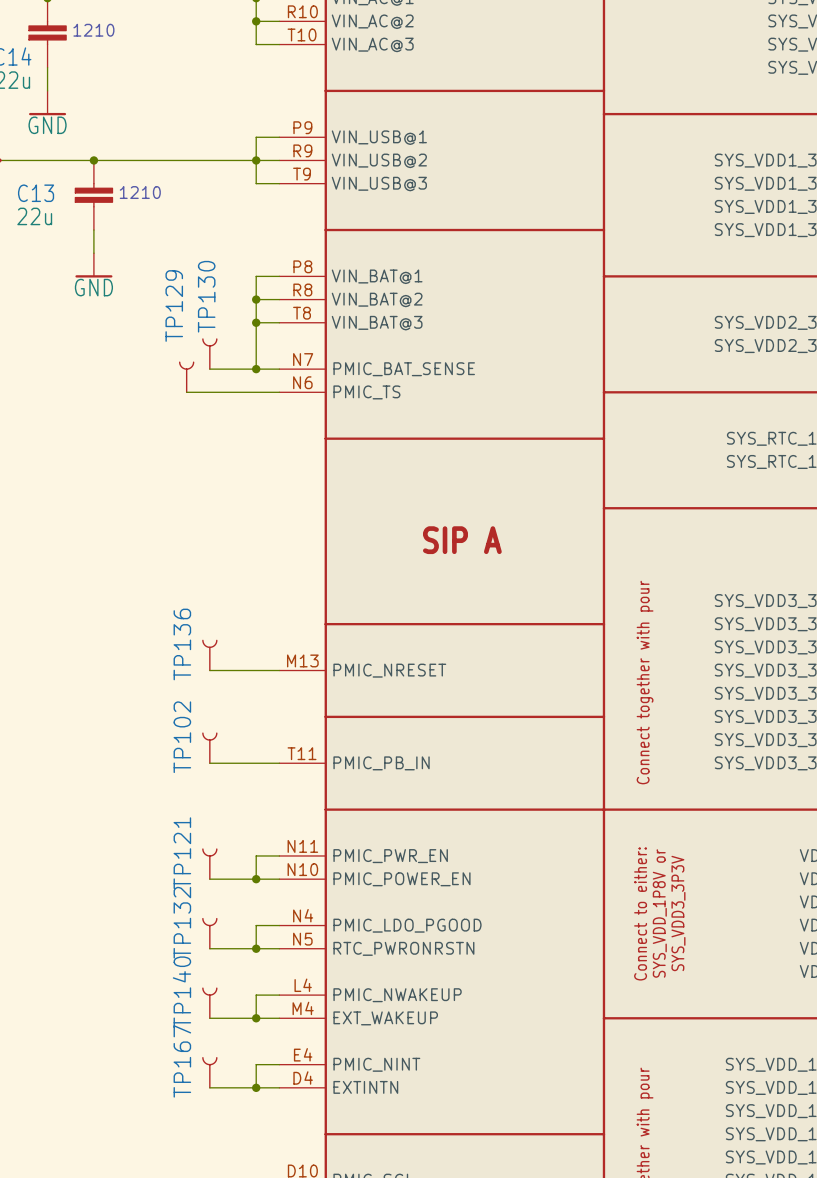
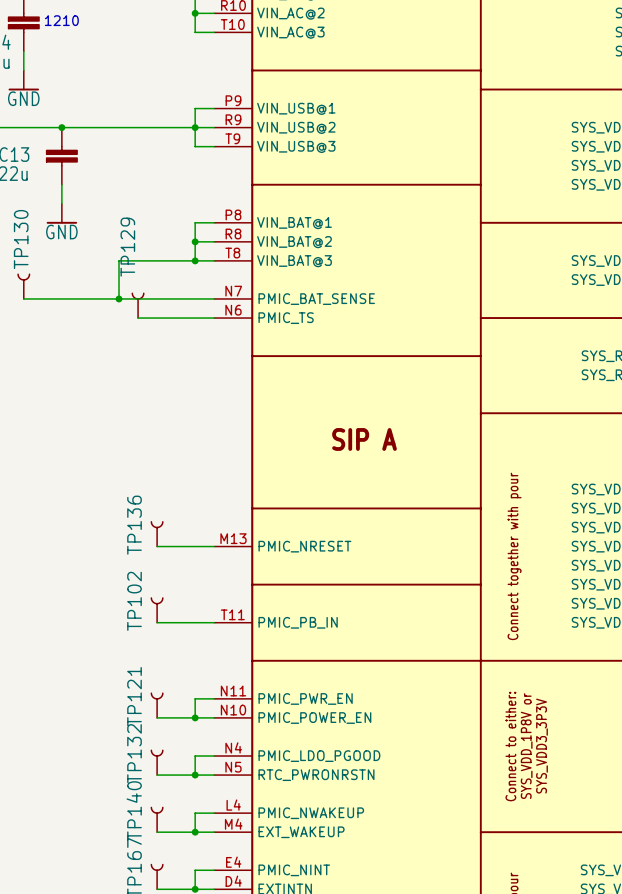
text: 1210 (140, 192) -> none
wire: (256, 322) (256, 369) -> (195, 260) (119, 260) (119, 298)
TP130 position: (209, 354) -> (23, 286)
wire: none -> (23, 298) (157, 298)
junction: none -> (119, 298)
junction: (256, 369) -> none

